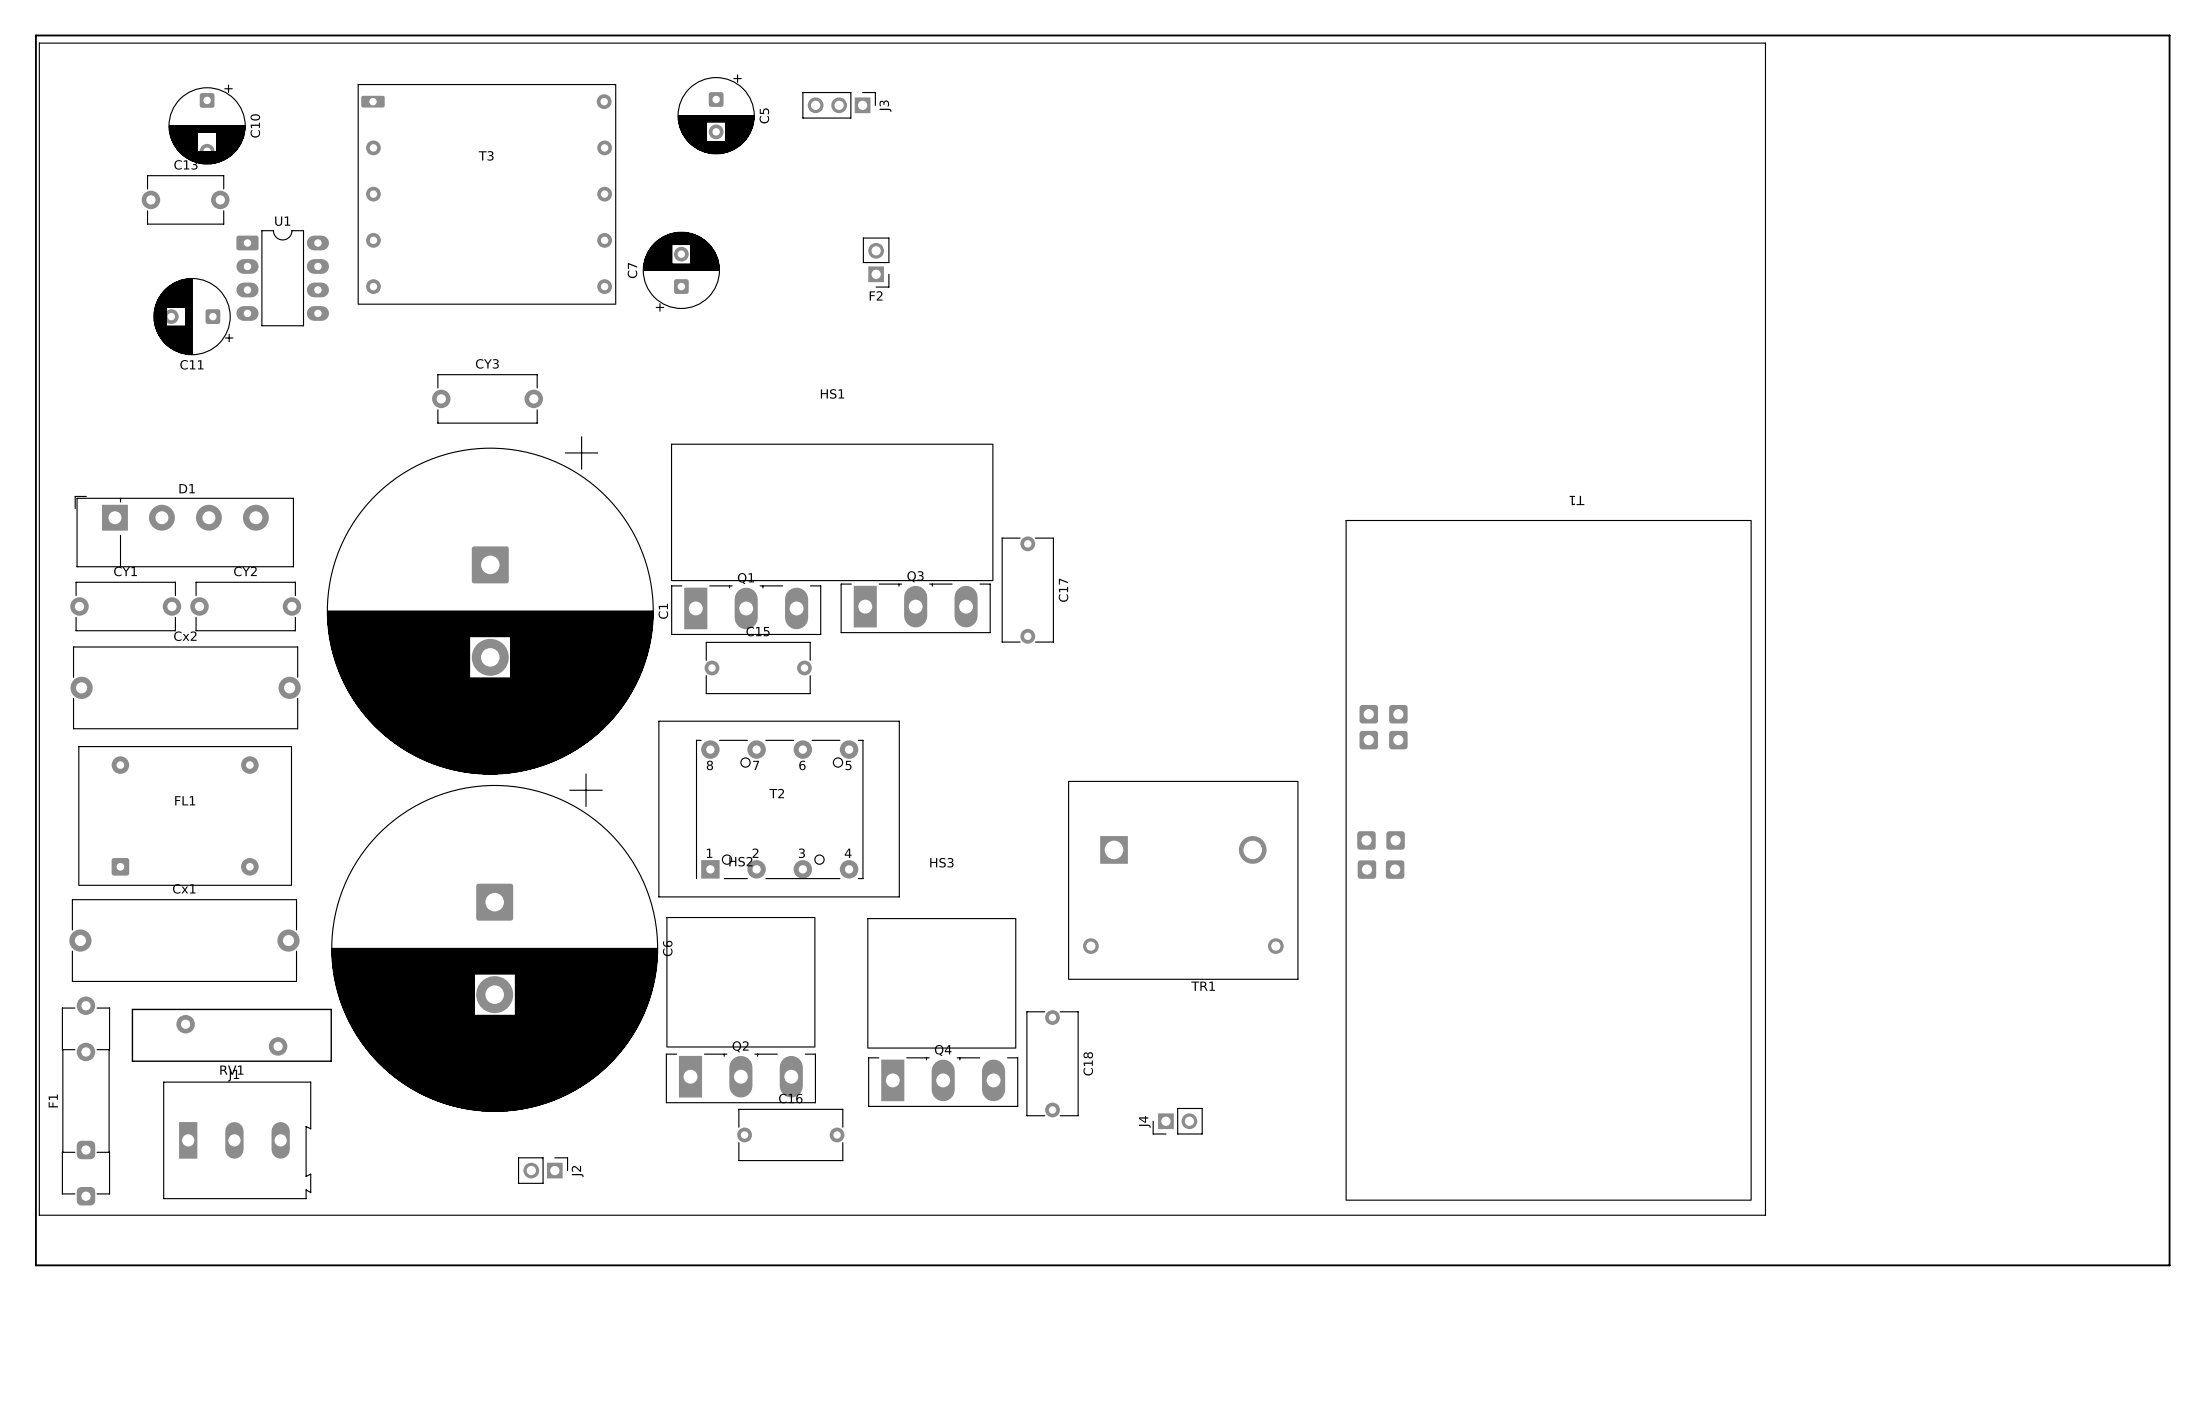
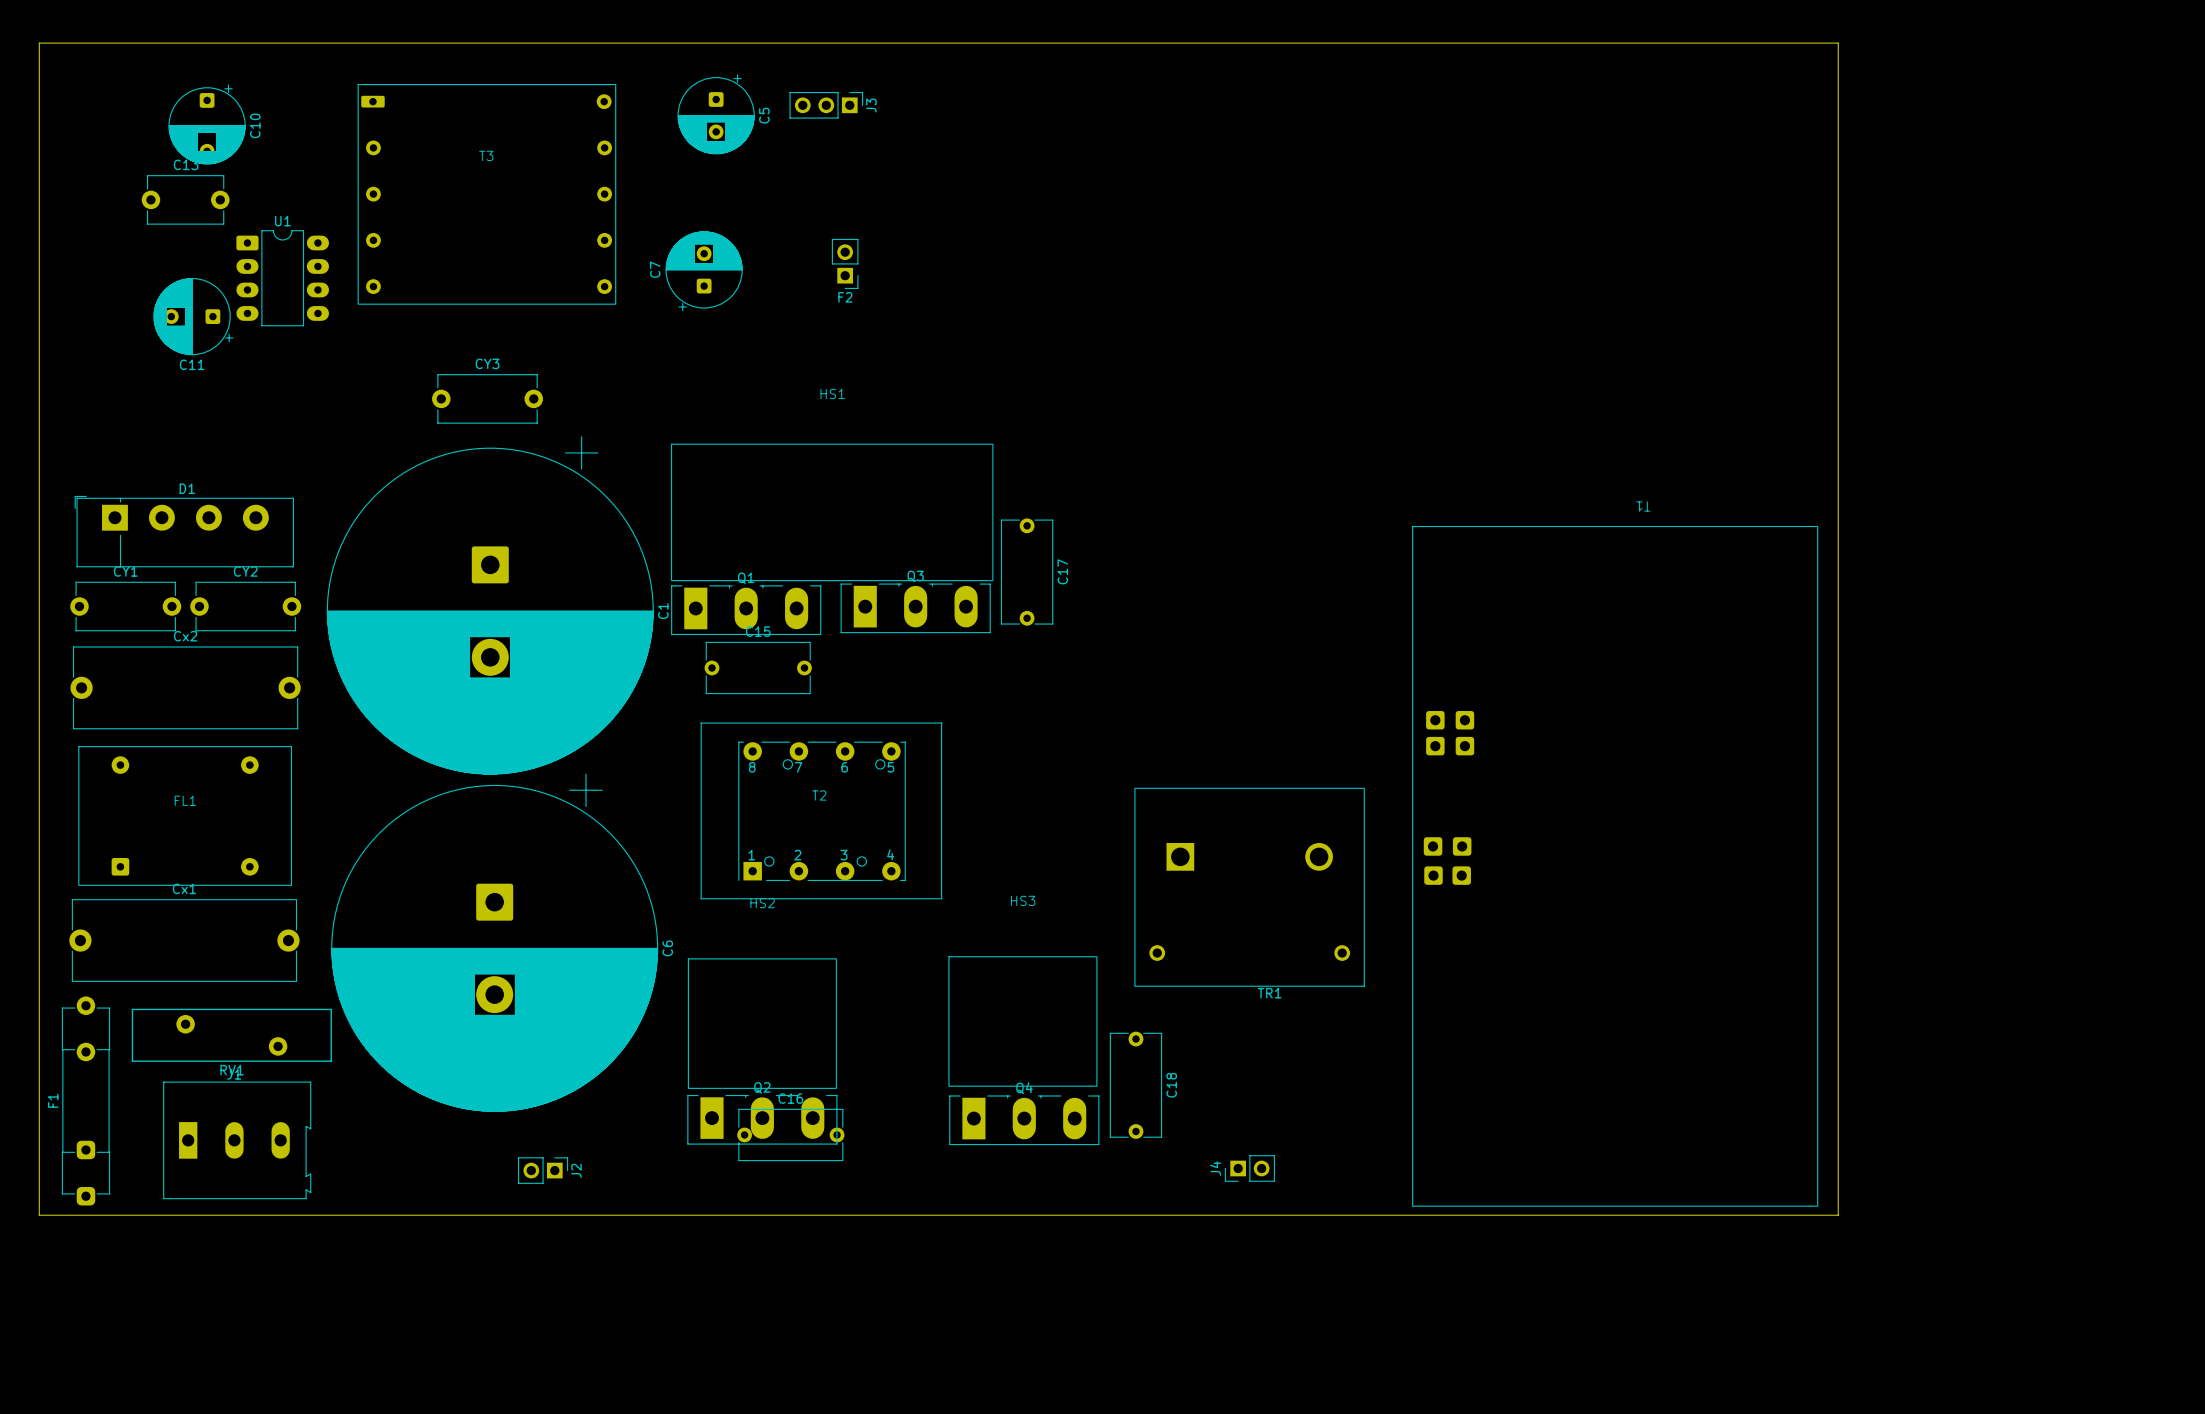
board edge: (35, 35) (2169, 35) (2169, 1265) (35, 1265) (35, 35) -> none
board edge: (1765, 43) (1765, 1215) -> (1765, 43) (1838, 43) (1838, 1215) (1765, 1215)
J3 position: (839, 105) -> (826, 105)
F2 position: (876, 262) -> (845, 263)
C7 position: (681, 271) -> (704, 271)
C17 position: (1027, 590) -> (1027, 572)
T2 position: (779, 809) -> (821, 810)
T1 position: (1548, 860) -> (1615, 866)
TR1 position: (1183, 880) -> (1249, 887)
HS2 position: (740, 982) -> (762, 1023)
HS3 position: (941, 983) -> (1022, 1021)
C18 position: (1052, 1063) -> (1135, 1085)
Q2 position: (740, 1078) -> (762, 1119)
Q4 position: (943, 1082) -> (1024, 1120)
J4 position: (1177, 1121) -> (1249, 1168)

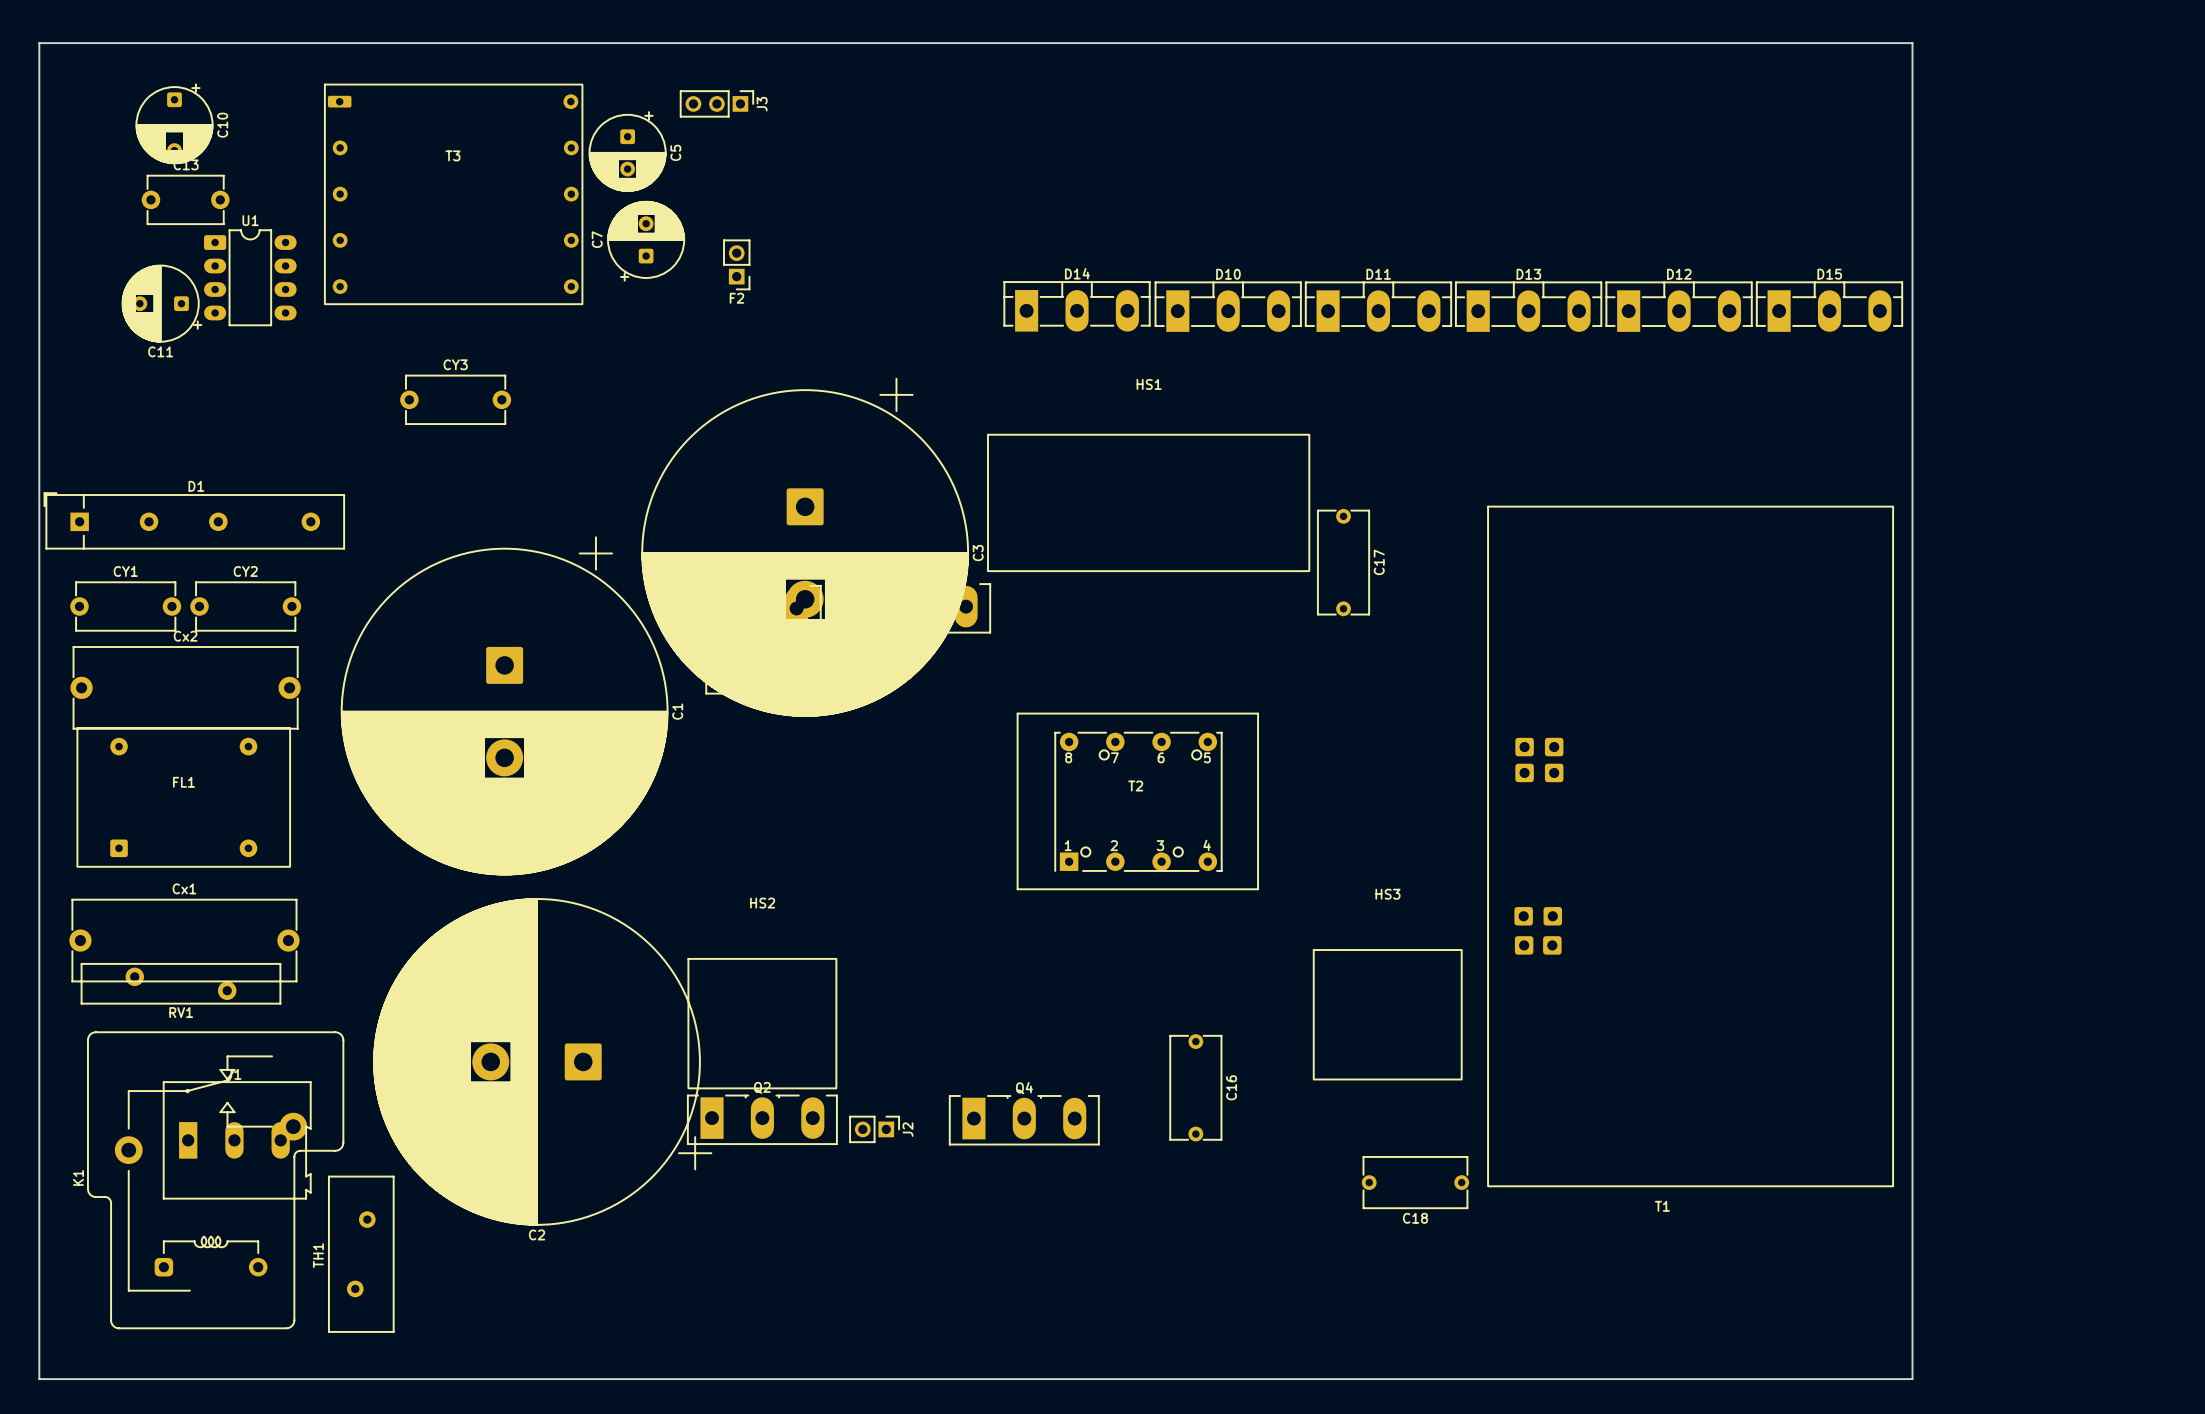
board edge: (1838, 43) (1838, 1215) (39, 1215) -> (1838, 43) (1912, 43) (1912, 1379) (39, 1379) (39, 1215)
J3 position: (826, 105) -> (716, 103)
C5 position: (716, 114) -> (627, 151)
C10 position: (207, 124) -> (174, 123)
T3 position: (486, 194) -> (453, 194)
F2 position: (845, 263) -> (736, 264)
C7 position: (704, 271) -> (646, 241)
U1 position: (282, 278) -> (250, 277)
D14: none -> (1077, 306)
D10: none -> (1228, 306)
D11: none -> (1378, 306)
D13: none -> (1528, 306)
D12: none -> (1679, 306)
D15: none -> (1829, 306)
C11 position: (193, 316) -> (162, 303)
CY3 position: (487, 398) -> (455, 399)
D1 footprint: [74, 495, 294, 568] -> [43, 492, 345, 550]
T1 name position: T1 (1643, 506) -> T1 (1662, 1206)
HS1 position: (832, 512) -> (1148, 502)
T1 footprint: [1412, 526, 1819, 1207] -> [1487, 506, 1894, 1187]
C3: none -> (805, 547)
C17 position: (1027, 572) -> (1343, 562)
C1 position: (490, 605) -> (504, 705)
T2 position: (821, 810) -> (1137, 801)
FL1 position: (185, 815) -> (183, 797)
TR1: (1249, 887) -> none
C6: (494, 942) -> none
RV1 footprint: [131, 1008, 332, 1062] -> [80, 963, 282, 1005]
HS3 position: (1022, 1021) -> (1387, 1014)
C2: none -> (542, 1061)
C18 rotation: 0° (1135, 1085) -> 90° clockwise (1415, 1182)
C18 position: (1135, 1085) -> (1415, 1182)
F1: (85, 1100) -> none
C16 rotation: 0° (790, 1134) -> 90° clockwise (1195, 1087)
C16 position: (790, 1134) -> (1195, 1087)
J4: (1249, 1168) -> none
J2 position: (543, 1170) -> (874, 1129)
K1: none -> (215, 1180)
TH1: none -> (361, 1254)

